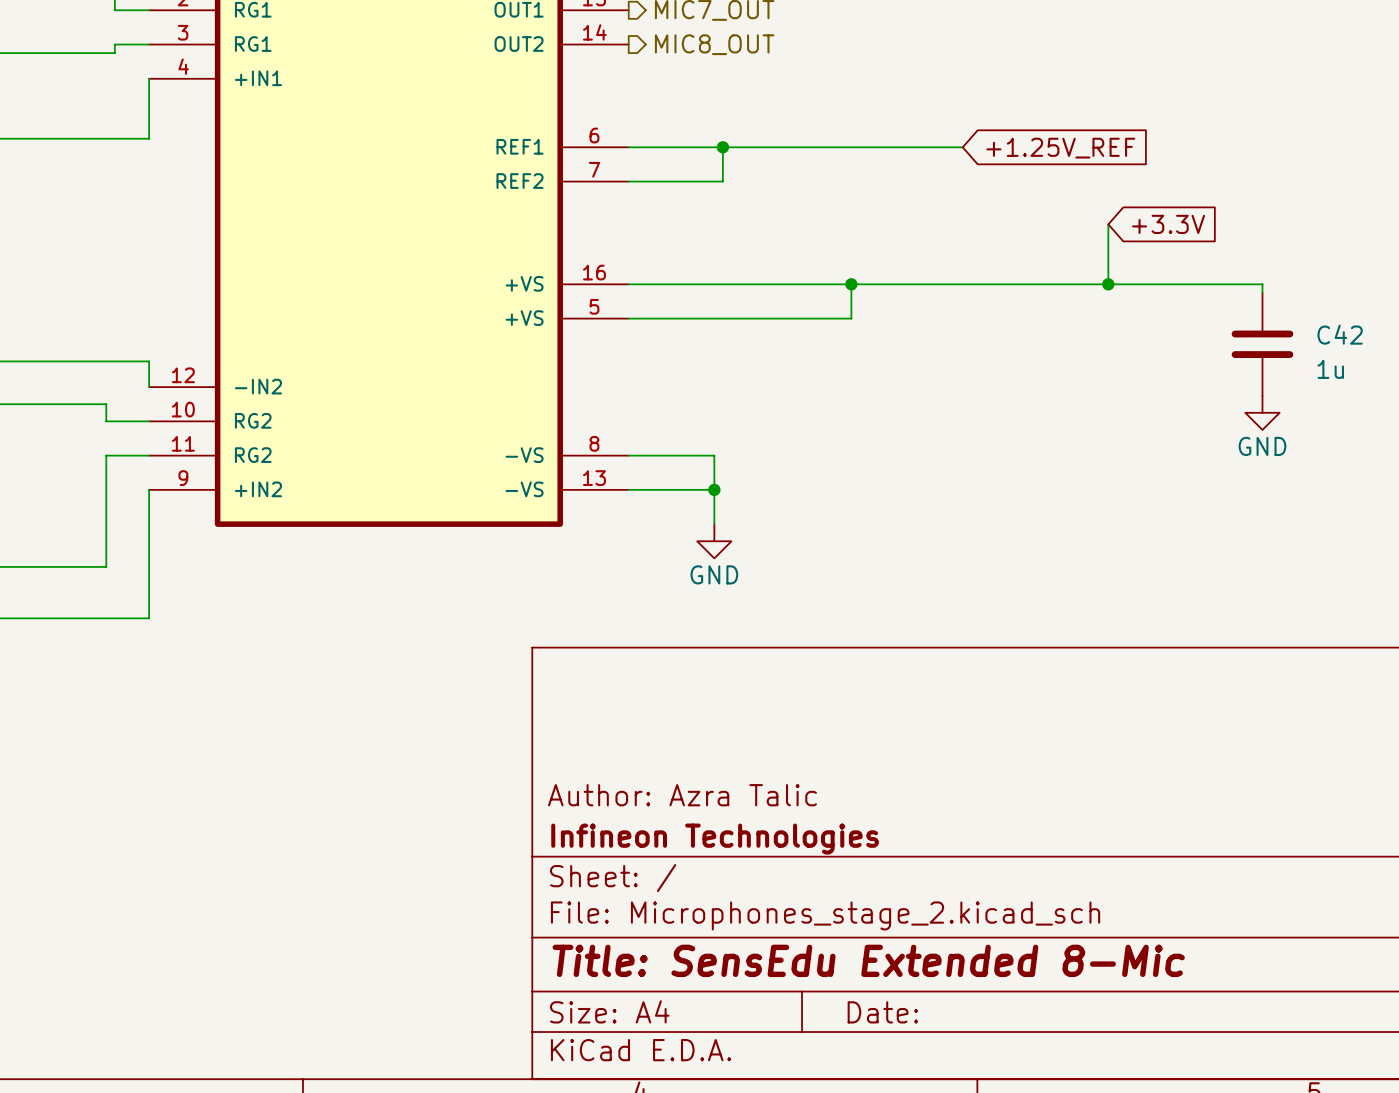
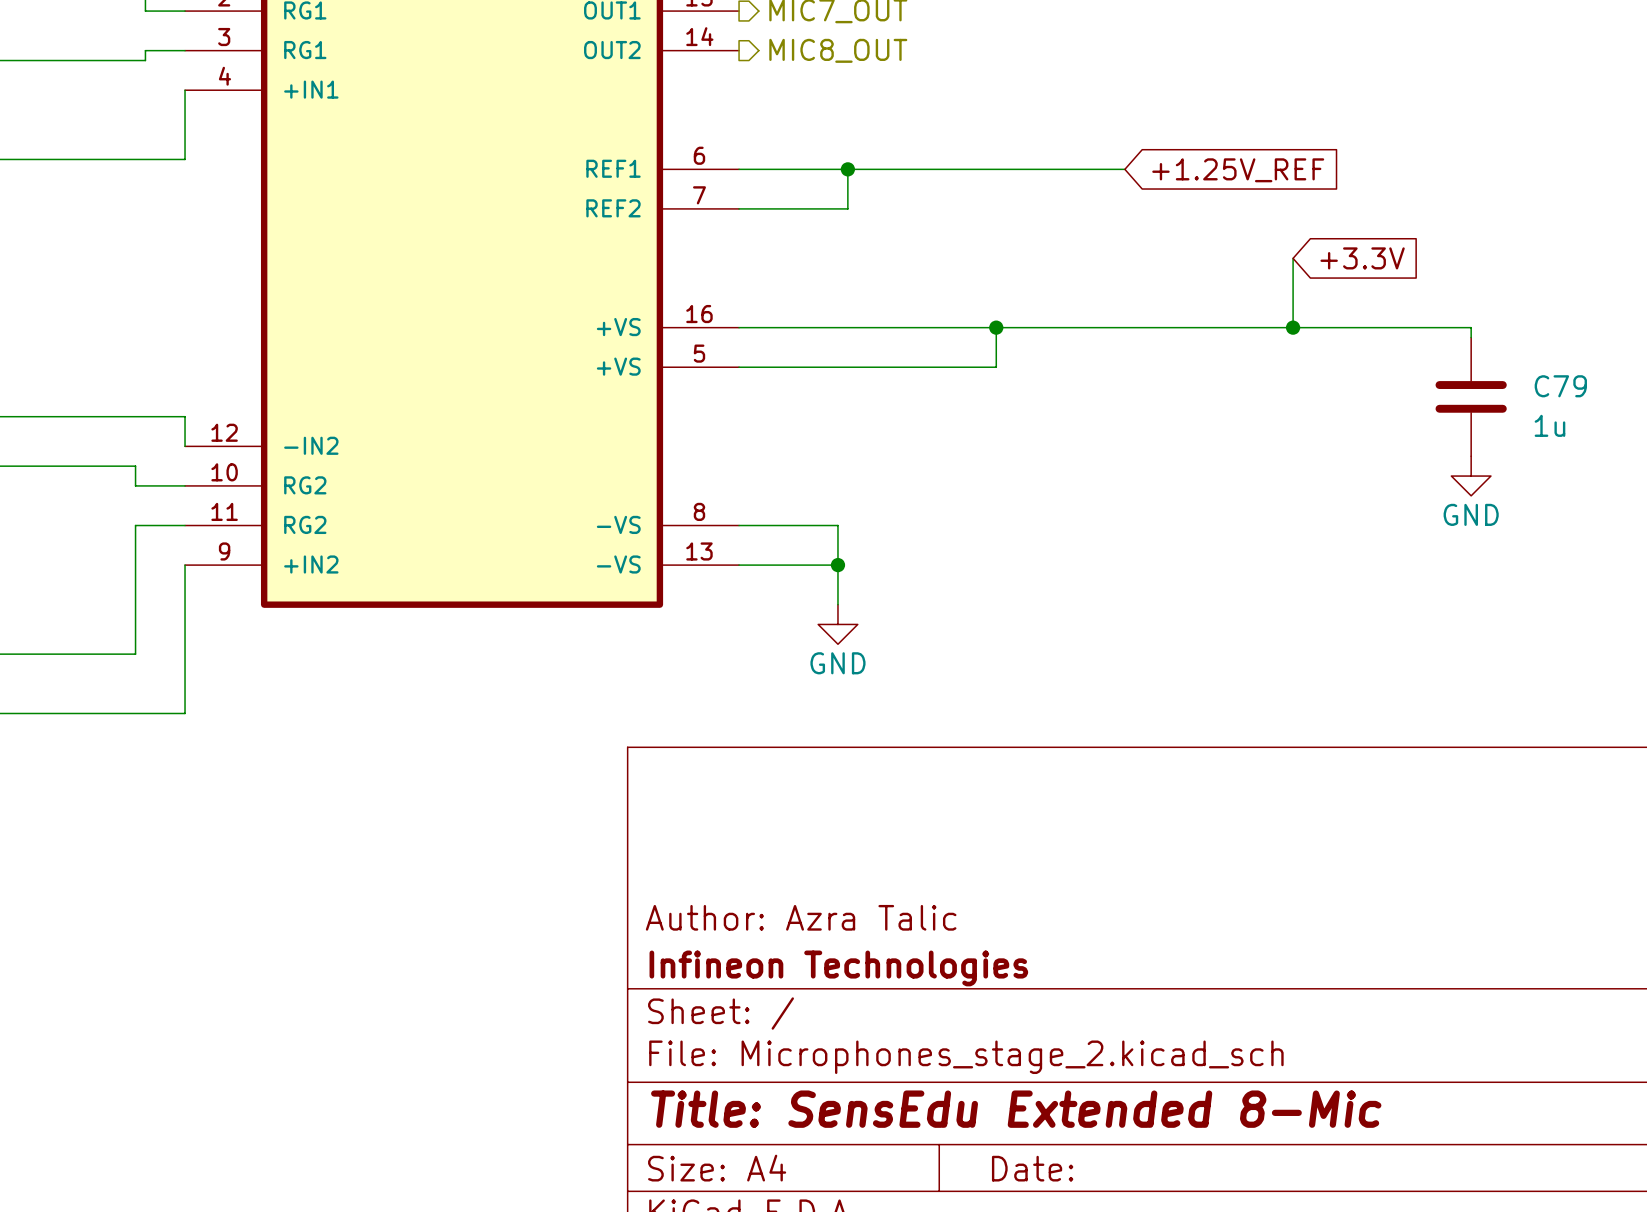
C42 name: C42 (1340, 334) -> C79 (1560, 386)

